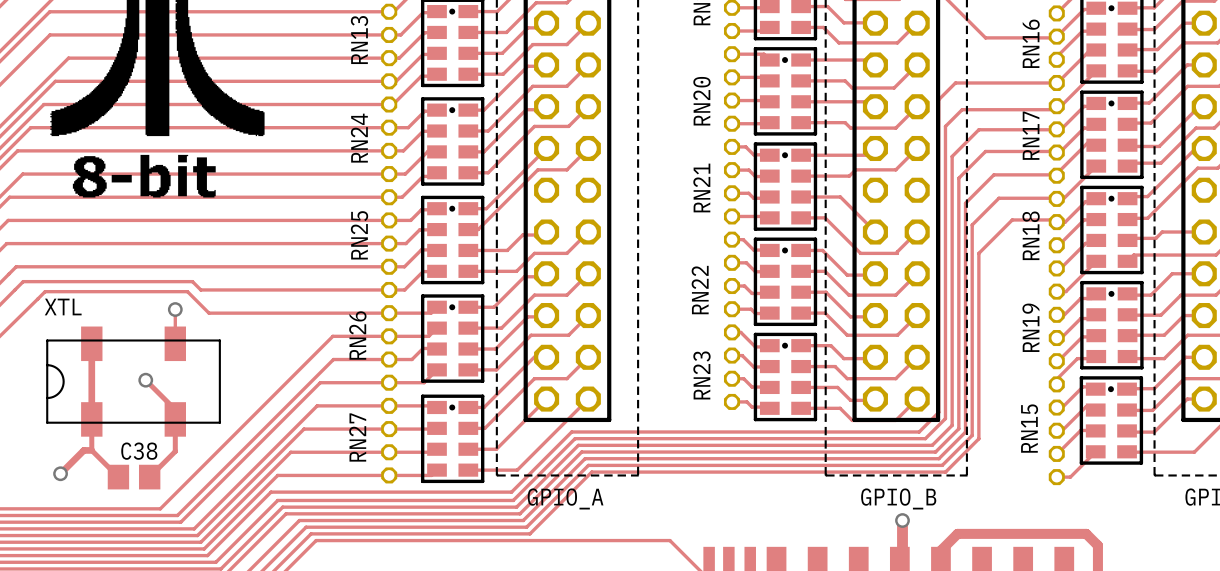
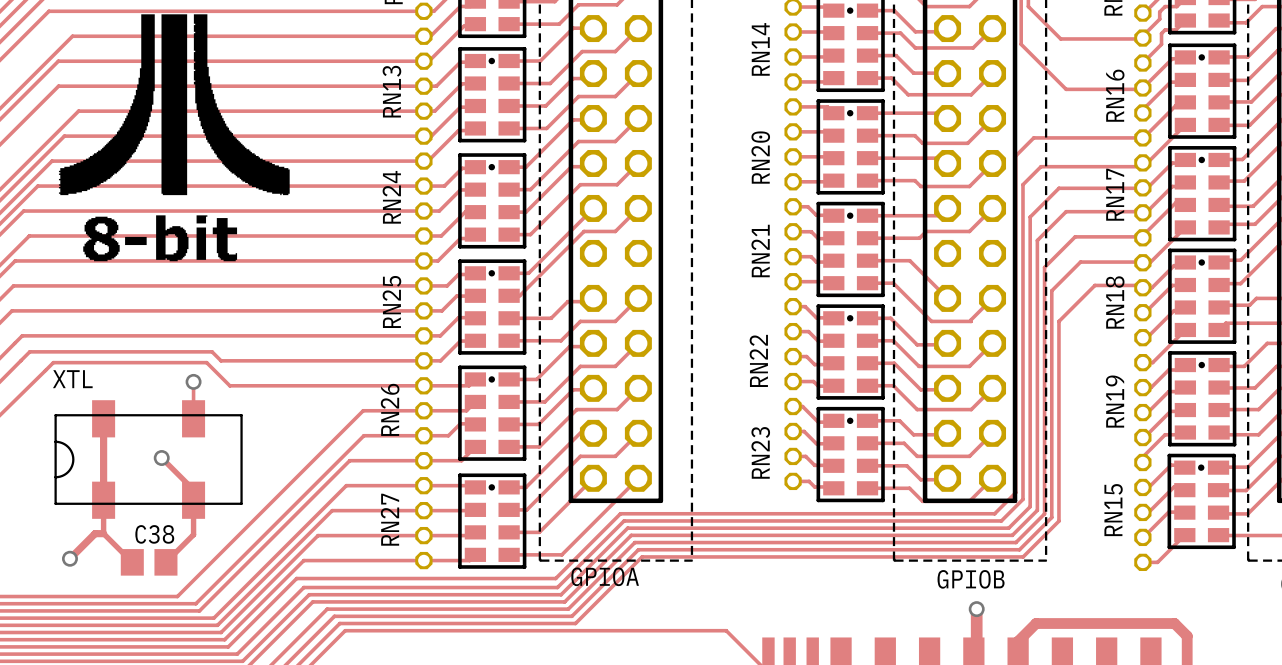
GPIO_A name: GPIO_A (565, 498) -> GPIOA (605, 576)
GPIO_B name: GPIO_B (898, 498) -> GPIOB (971, 579)

